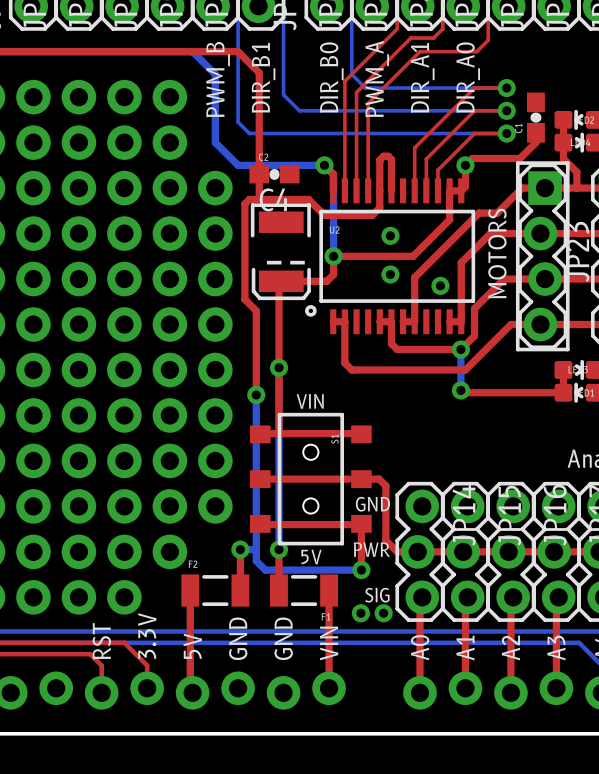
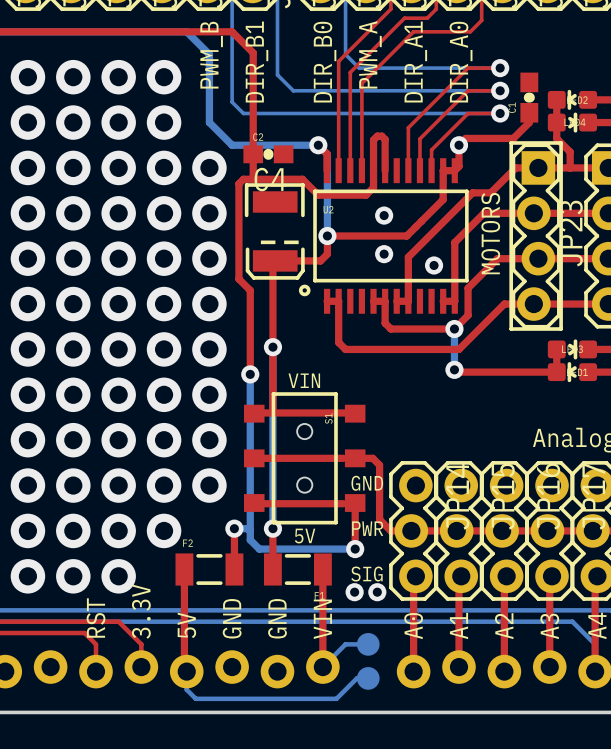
bottom track: none -> (368, 644) (345, 644) (322, 667)
part: none -> (368, 644)
bottom track: none -> (186, 671) (186, 689) (195, 698) (336, 698) (356, 678) (368, 678)
part: none -> (368, 678)

